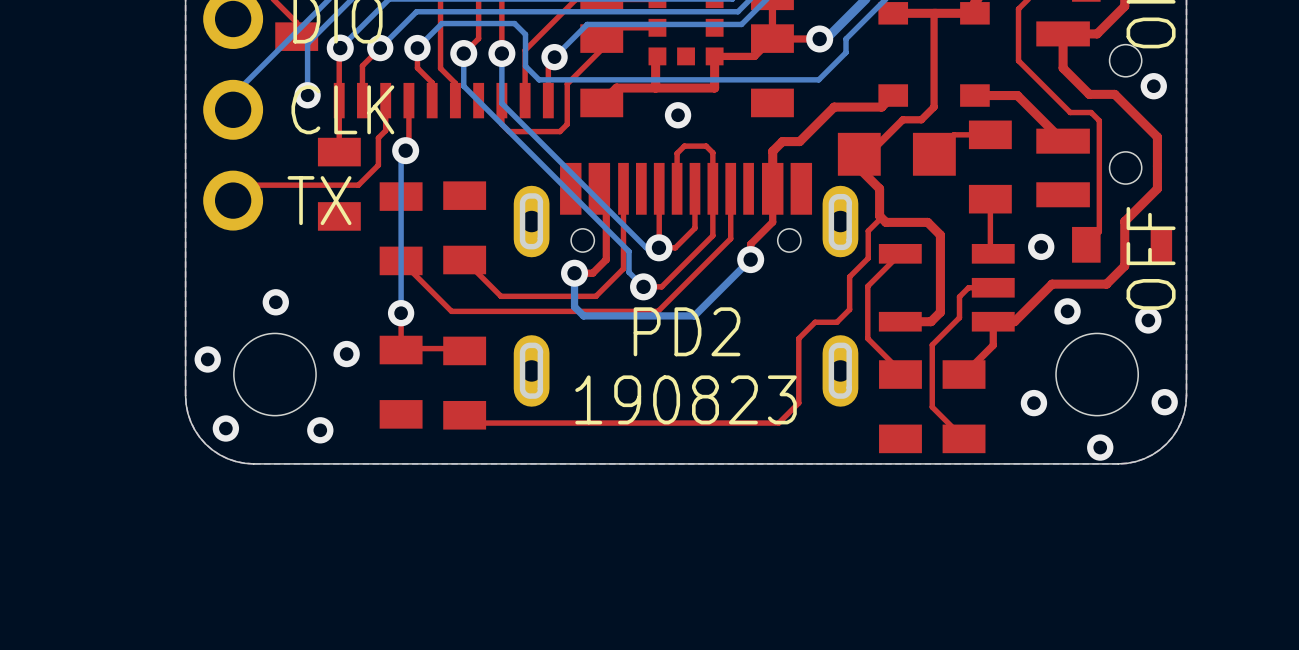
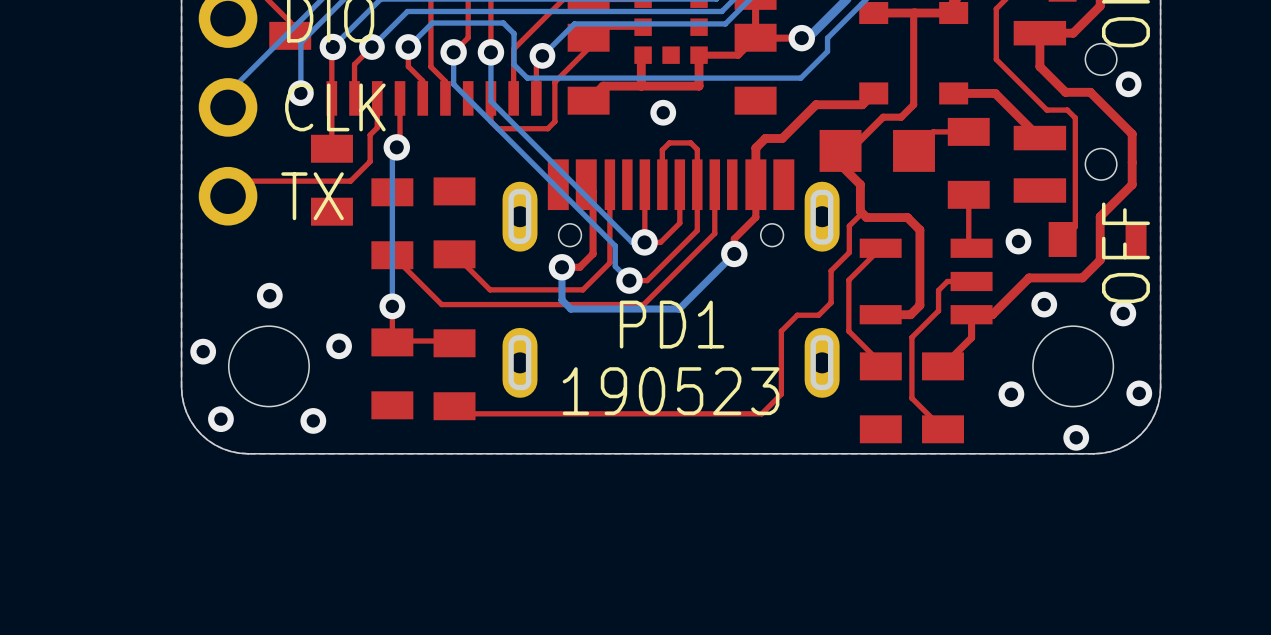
text: PD2 (687, 331) -> PD1 (672, 324)
text: 190823 (686, 399) -> 190523 (671, 391)

